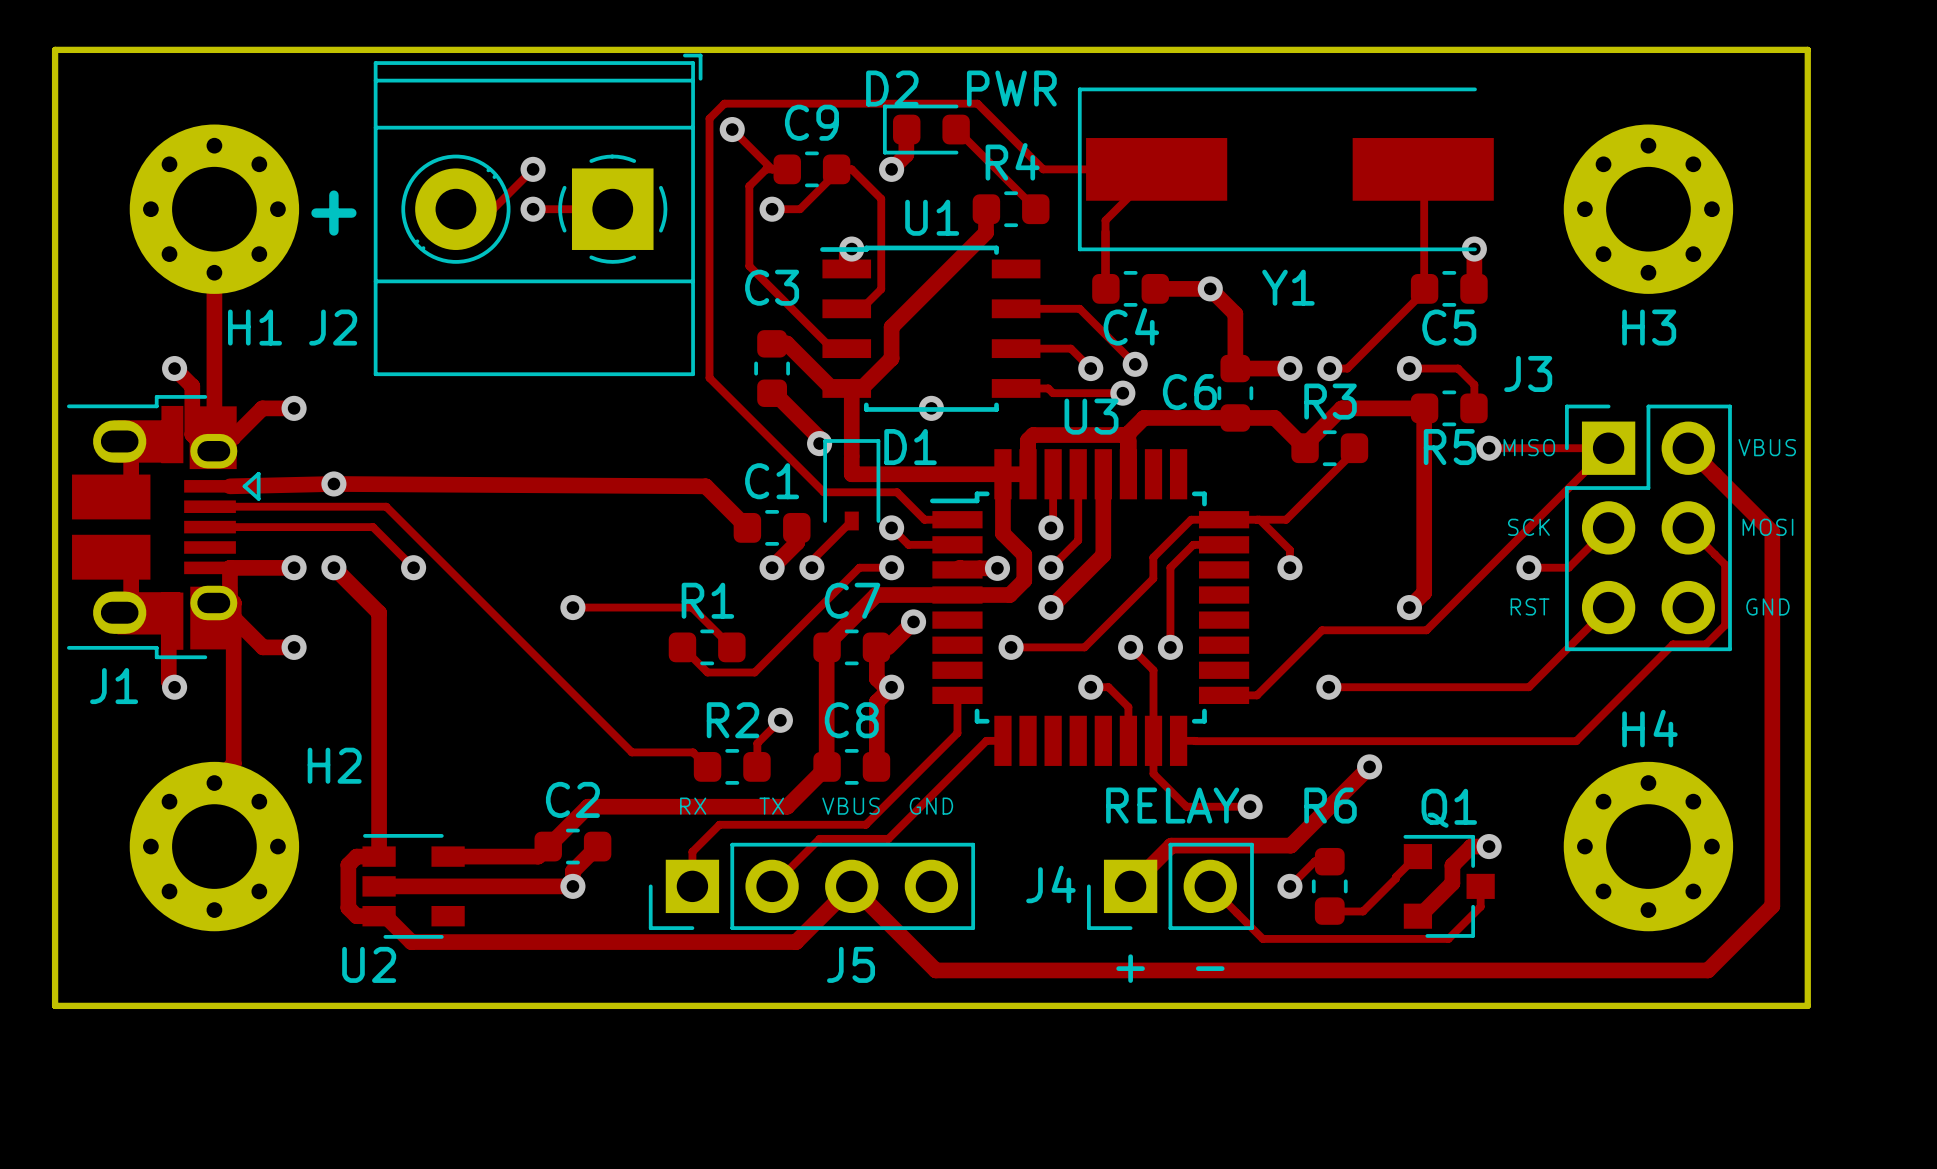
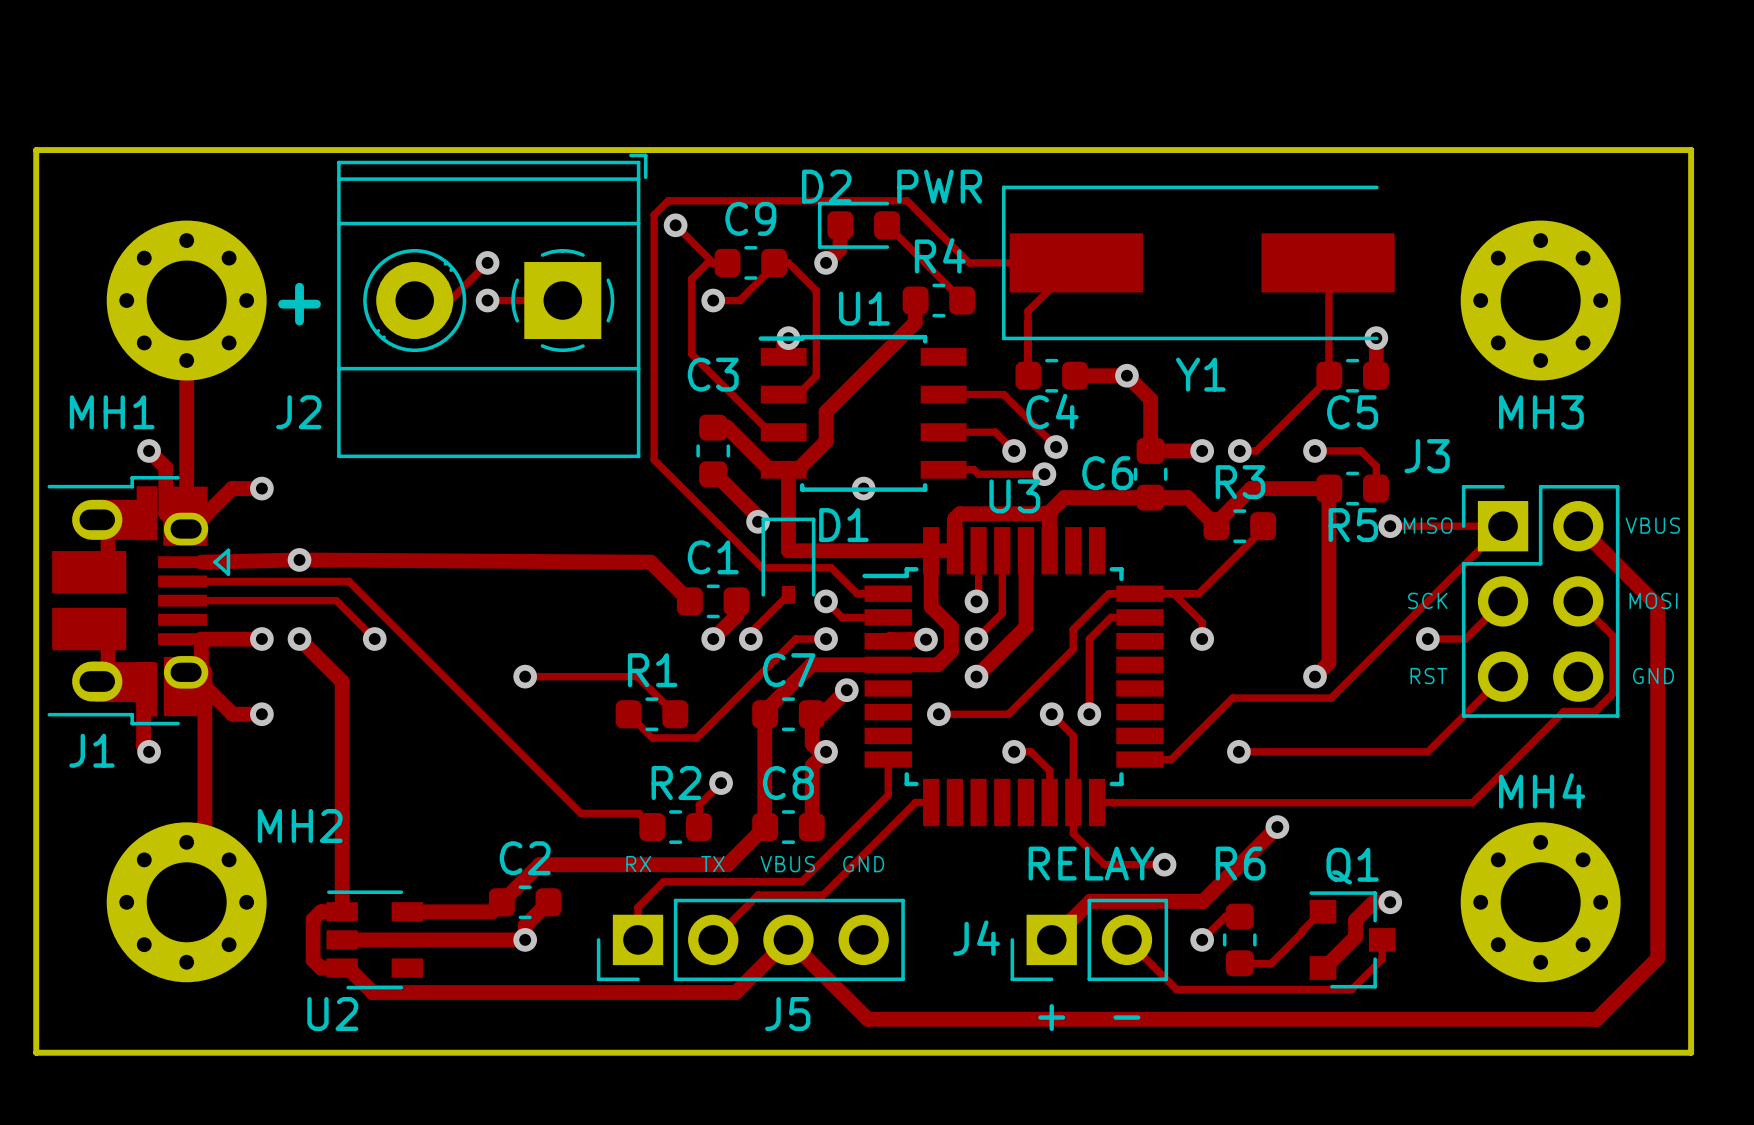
H1 name: H1 (255, 327) -> MH1 (112, 412)
H3 name: H3 (1649, 327) -> MH3 (1541, 412)
H4 name: H4 (1649, 728) -> MH4 (1542, 790)
H2 name: H2 (334, 765) -> MH2 (300, 825)

